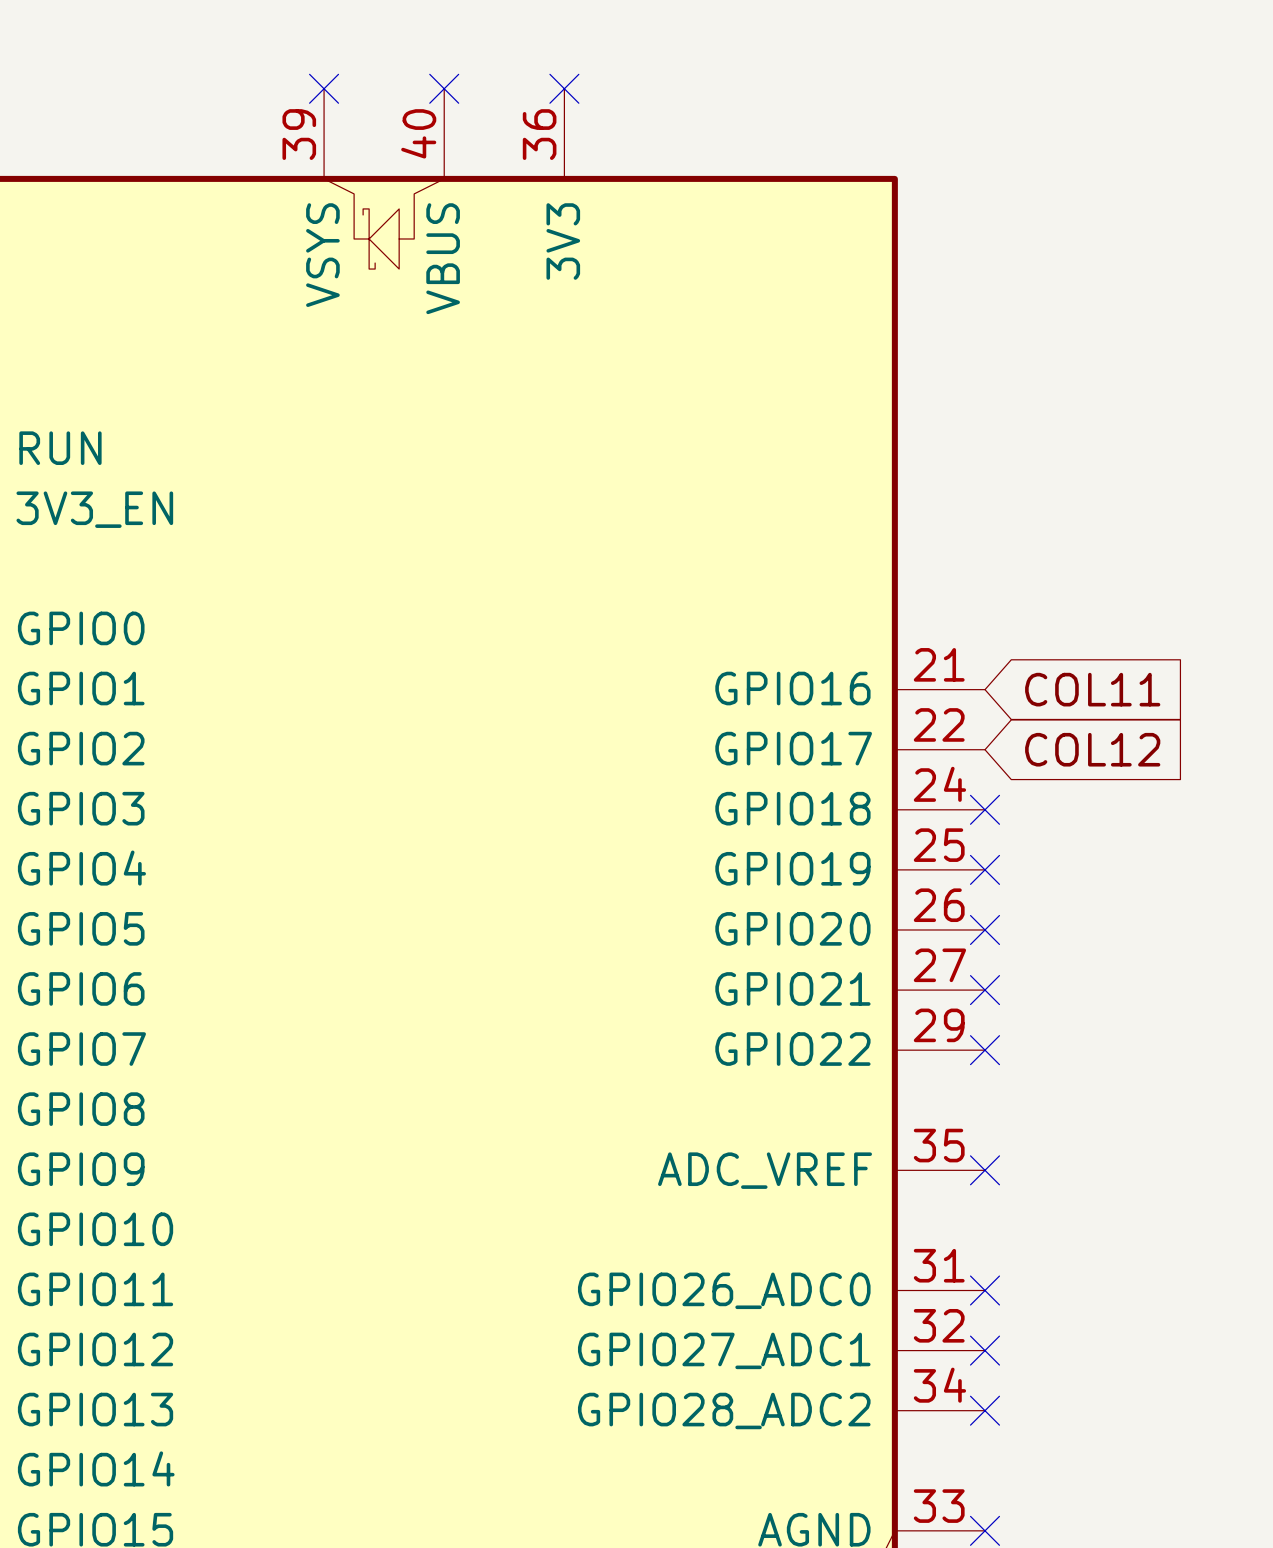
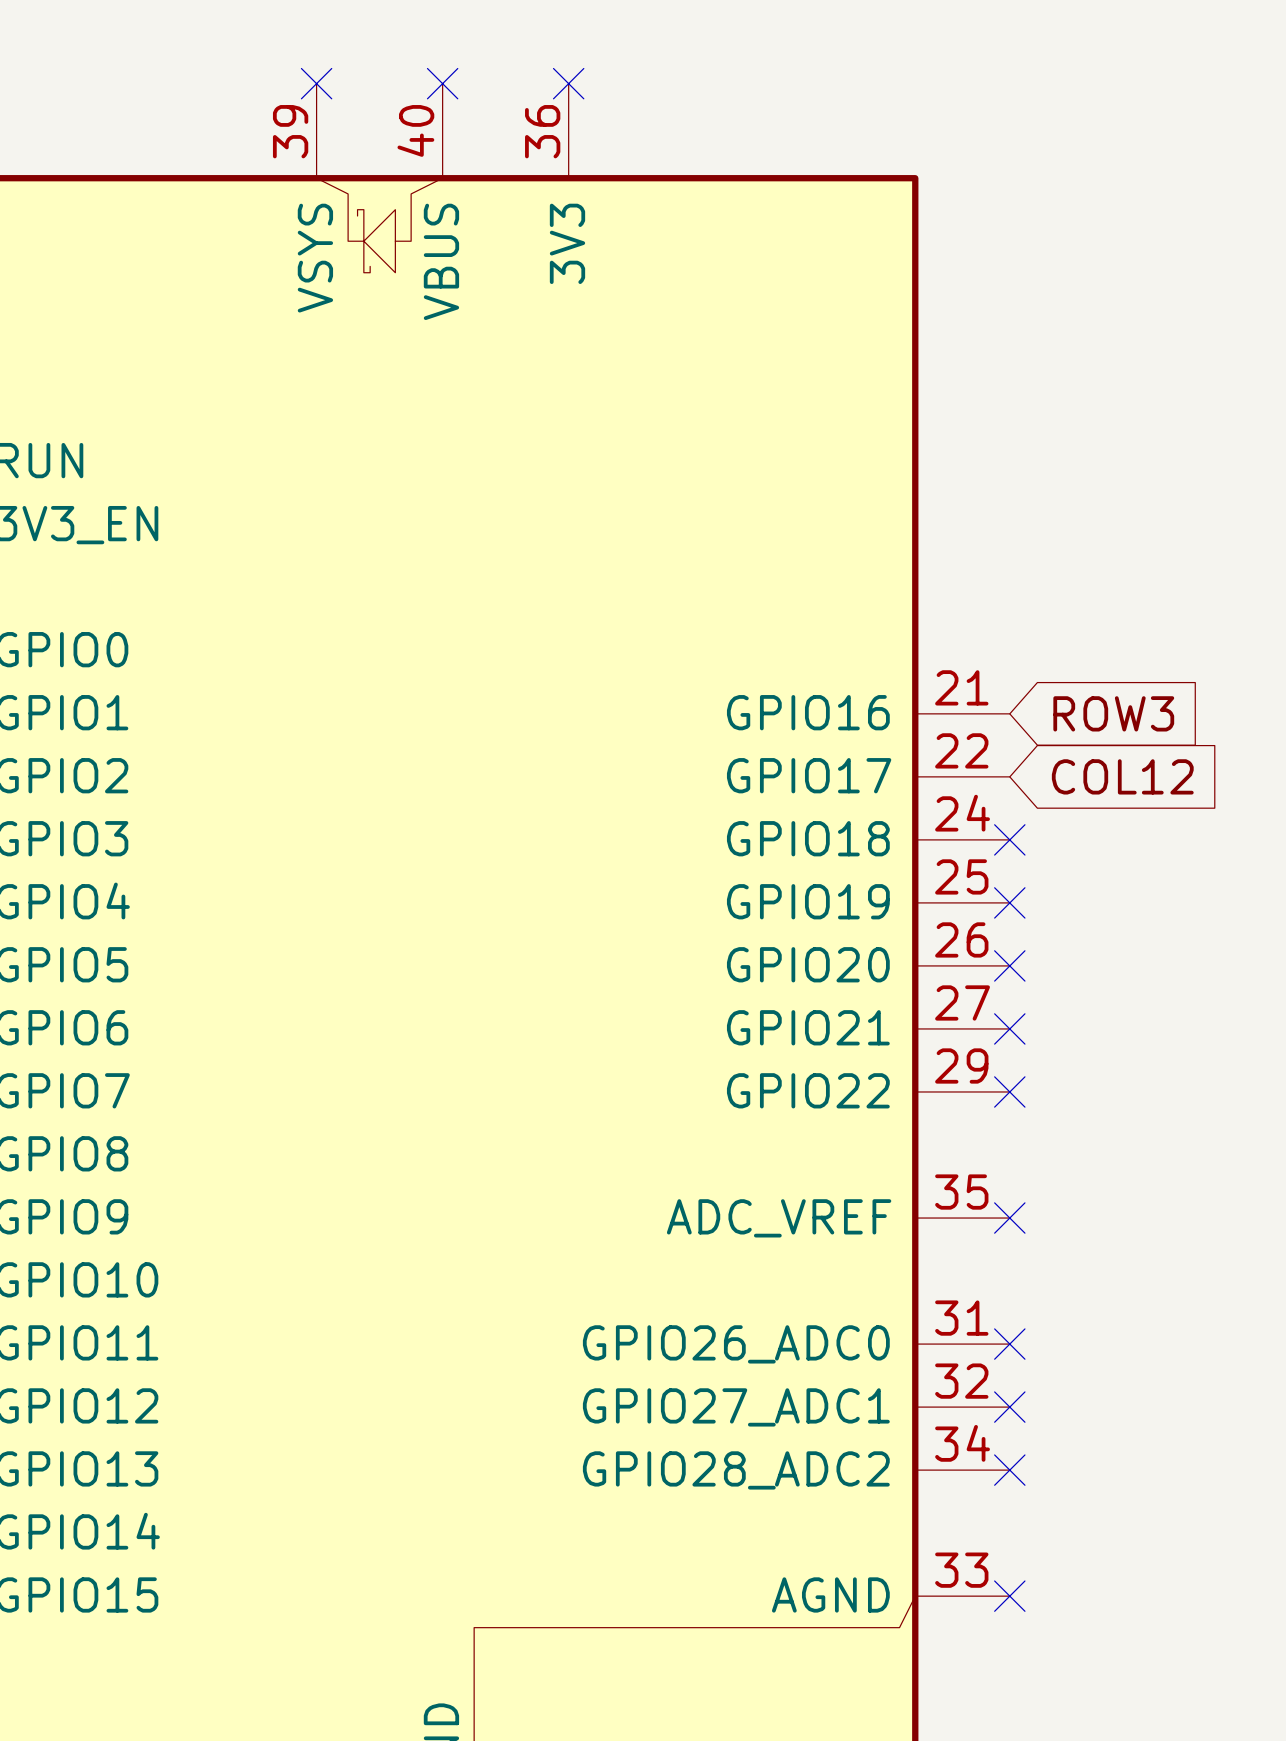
global label: COL11 (1092, 689) -> ROW3 (1113, 713)

